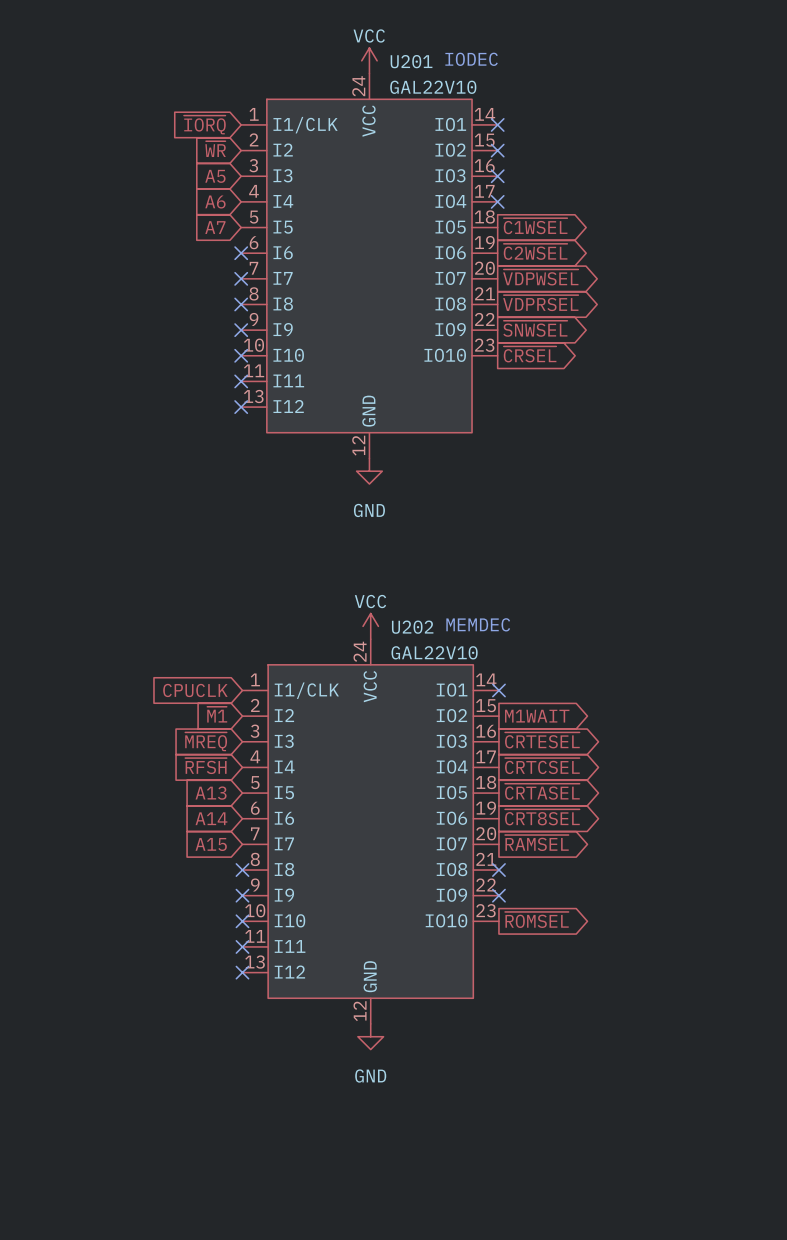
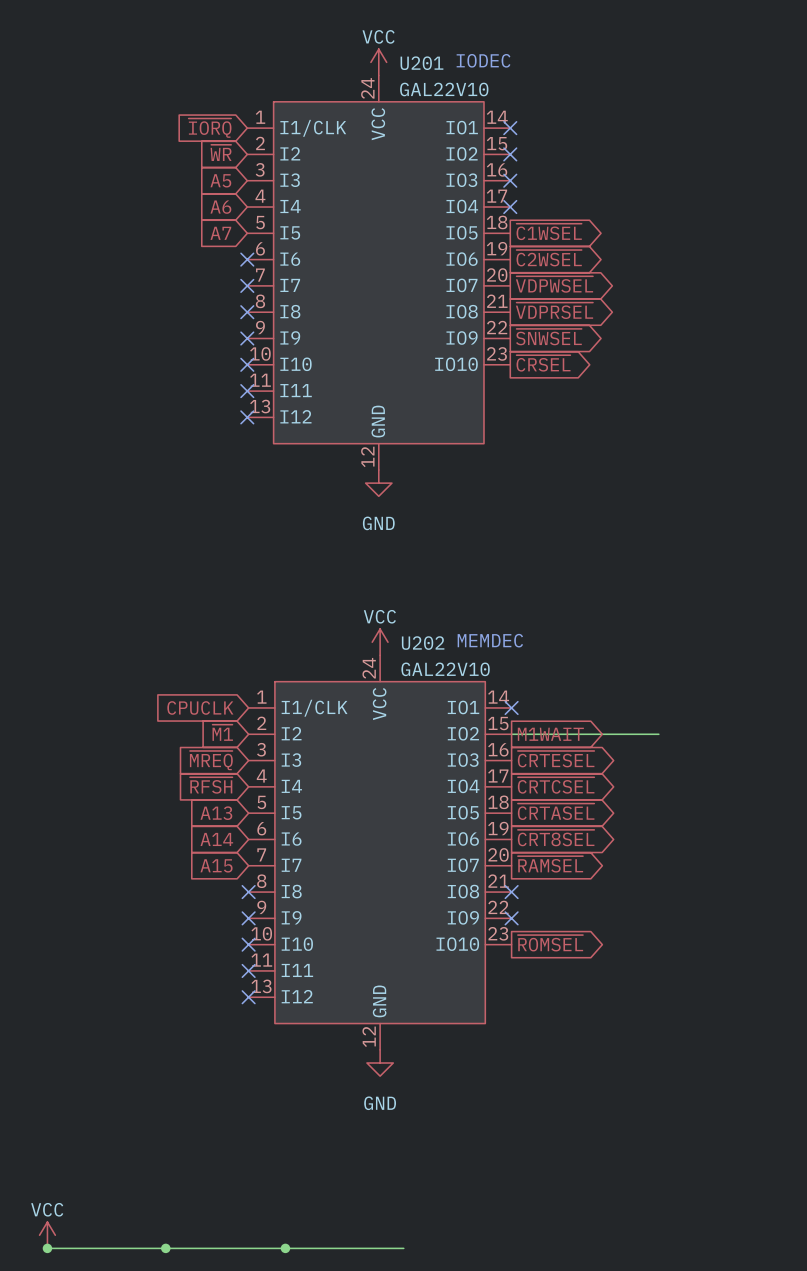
wire: none -> (511, 734) (658, 734)
power symbol: none -> VCC (47, 1235)
wire: none -> (47, 1248) (403, 1248)
junction: none -> (47, 1248)
junction: none -> (165, 1248)
junction: none -> (285, 1248)

